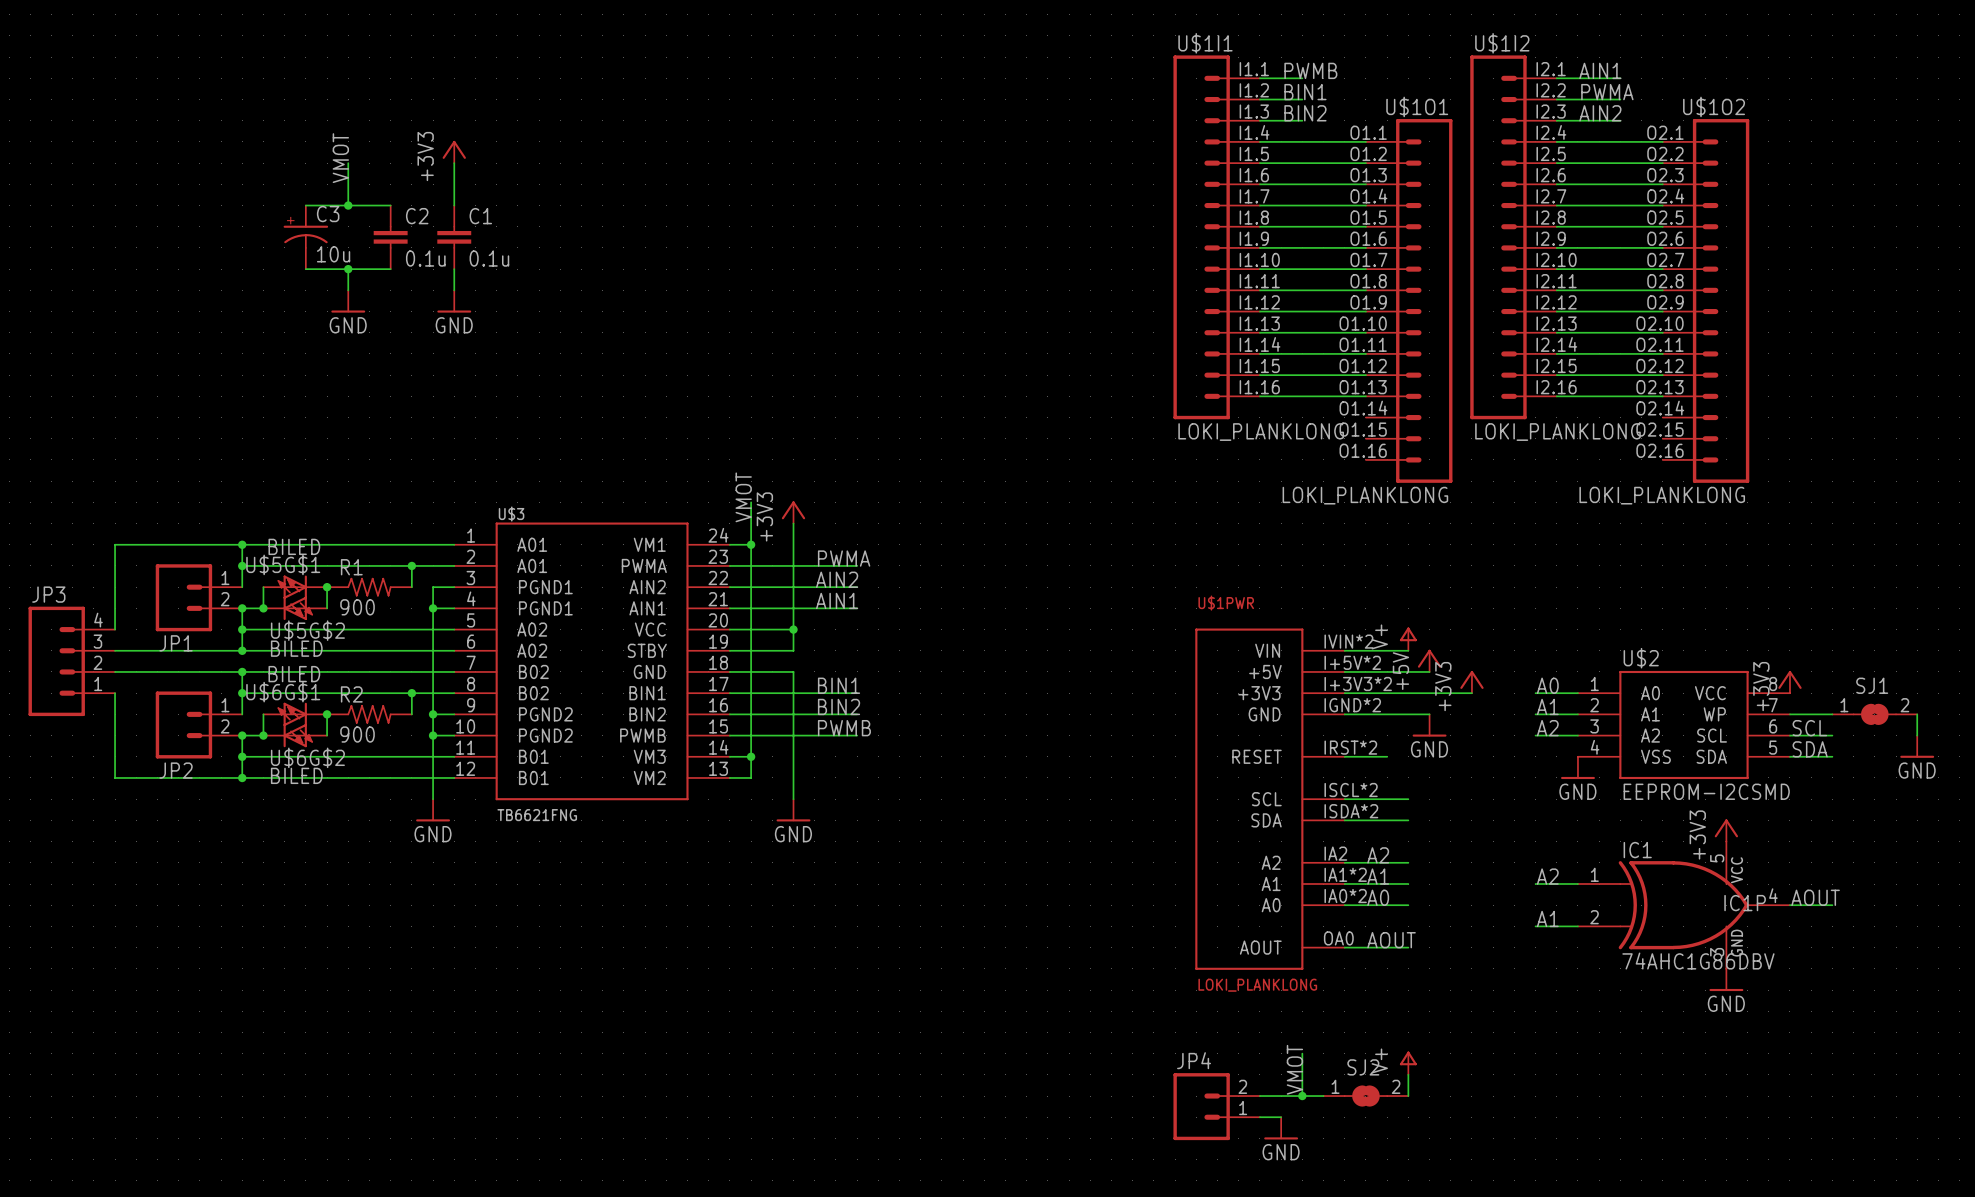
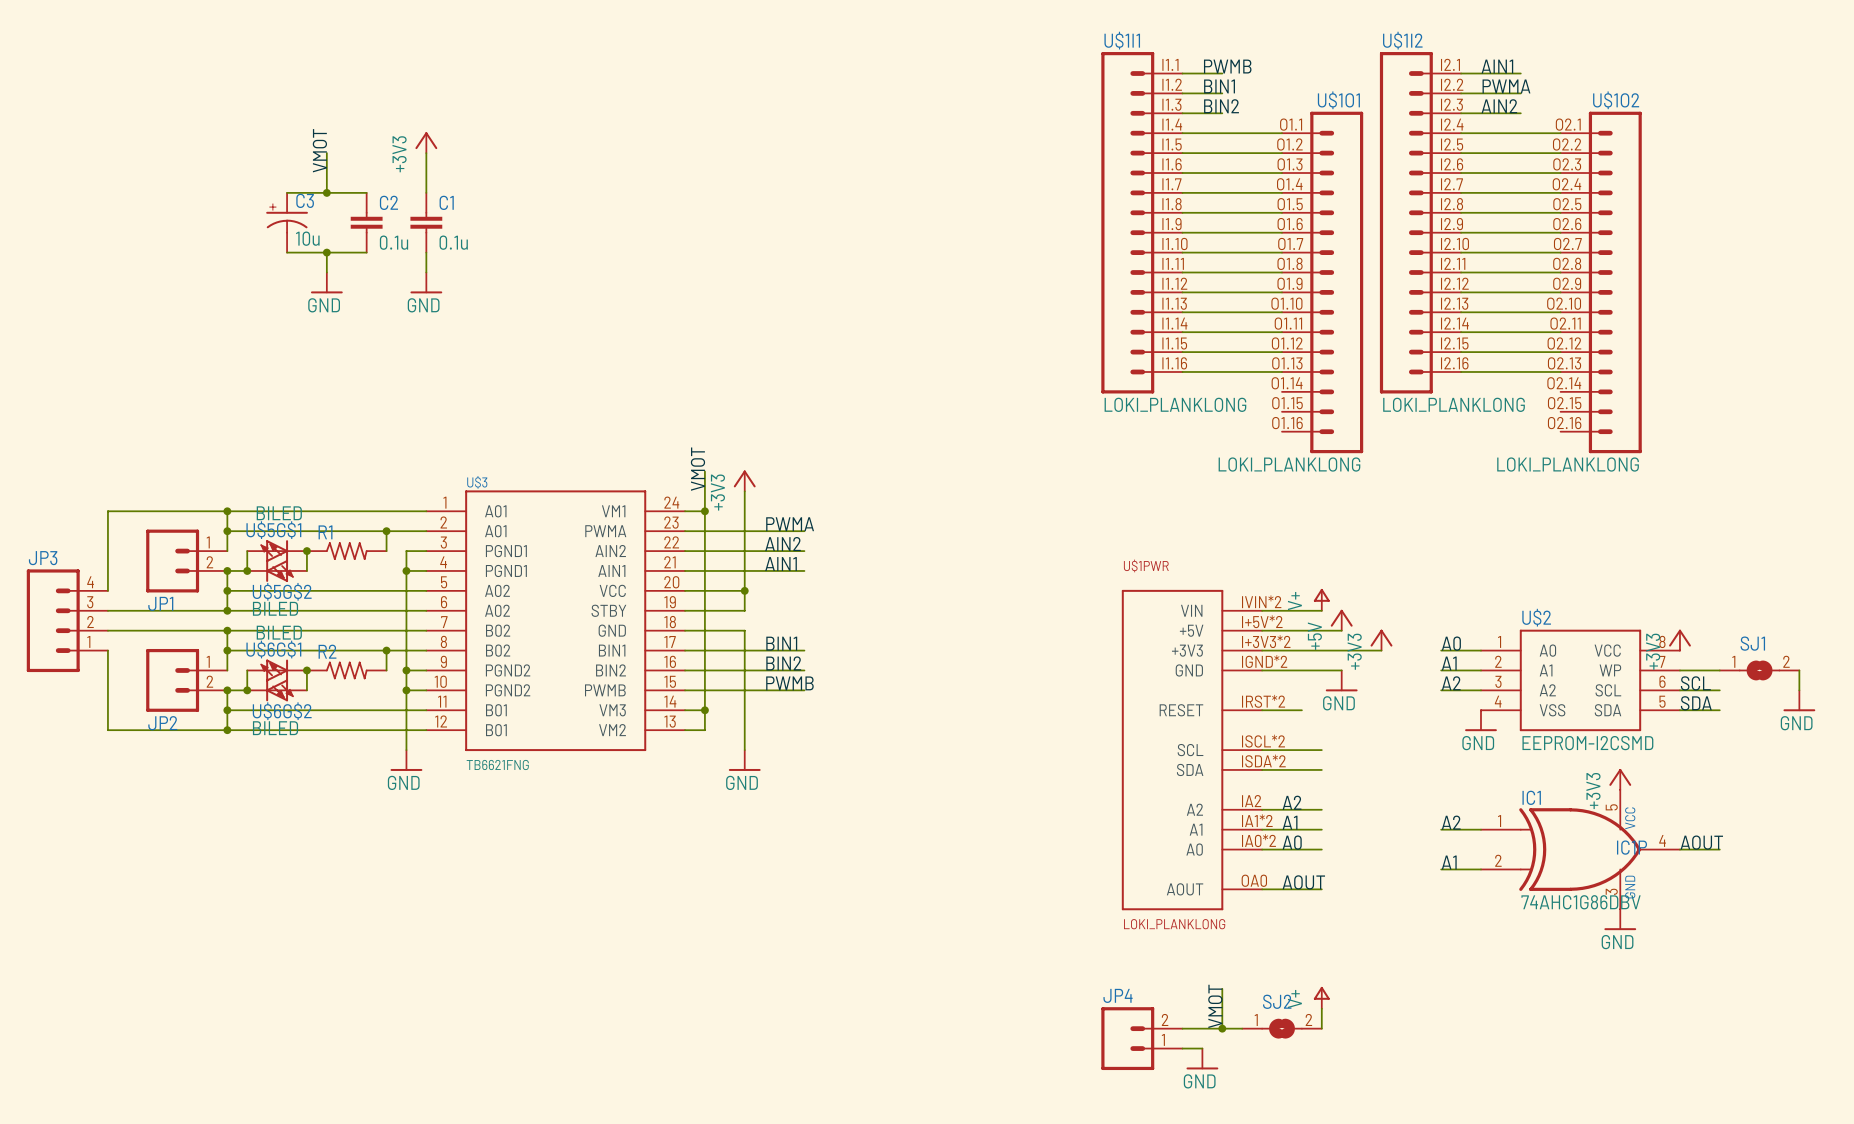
R1 value: 900 (357, 607) -> none
R2 value: 900 (357, 734) -> none

